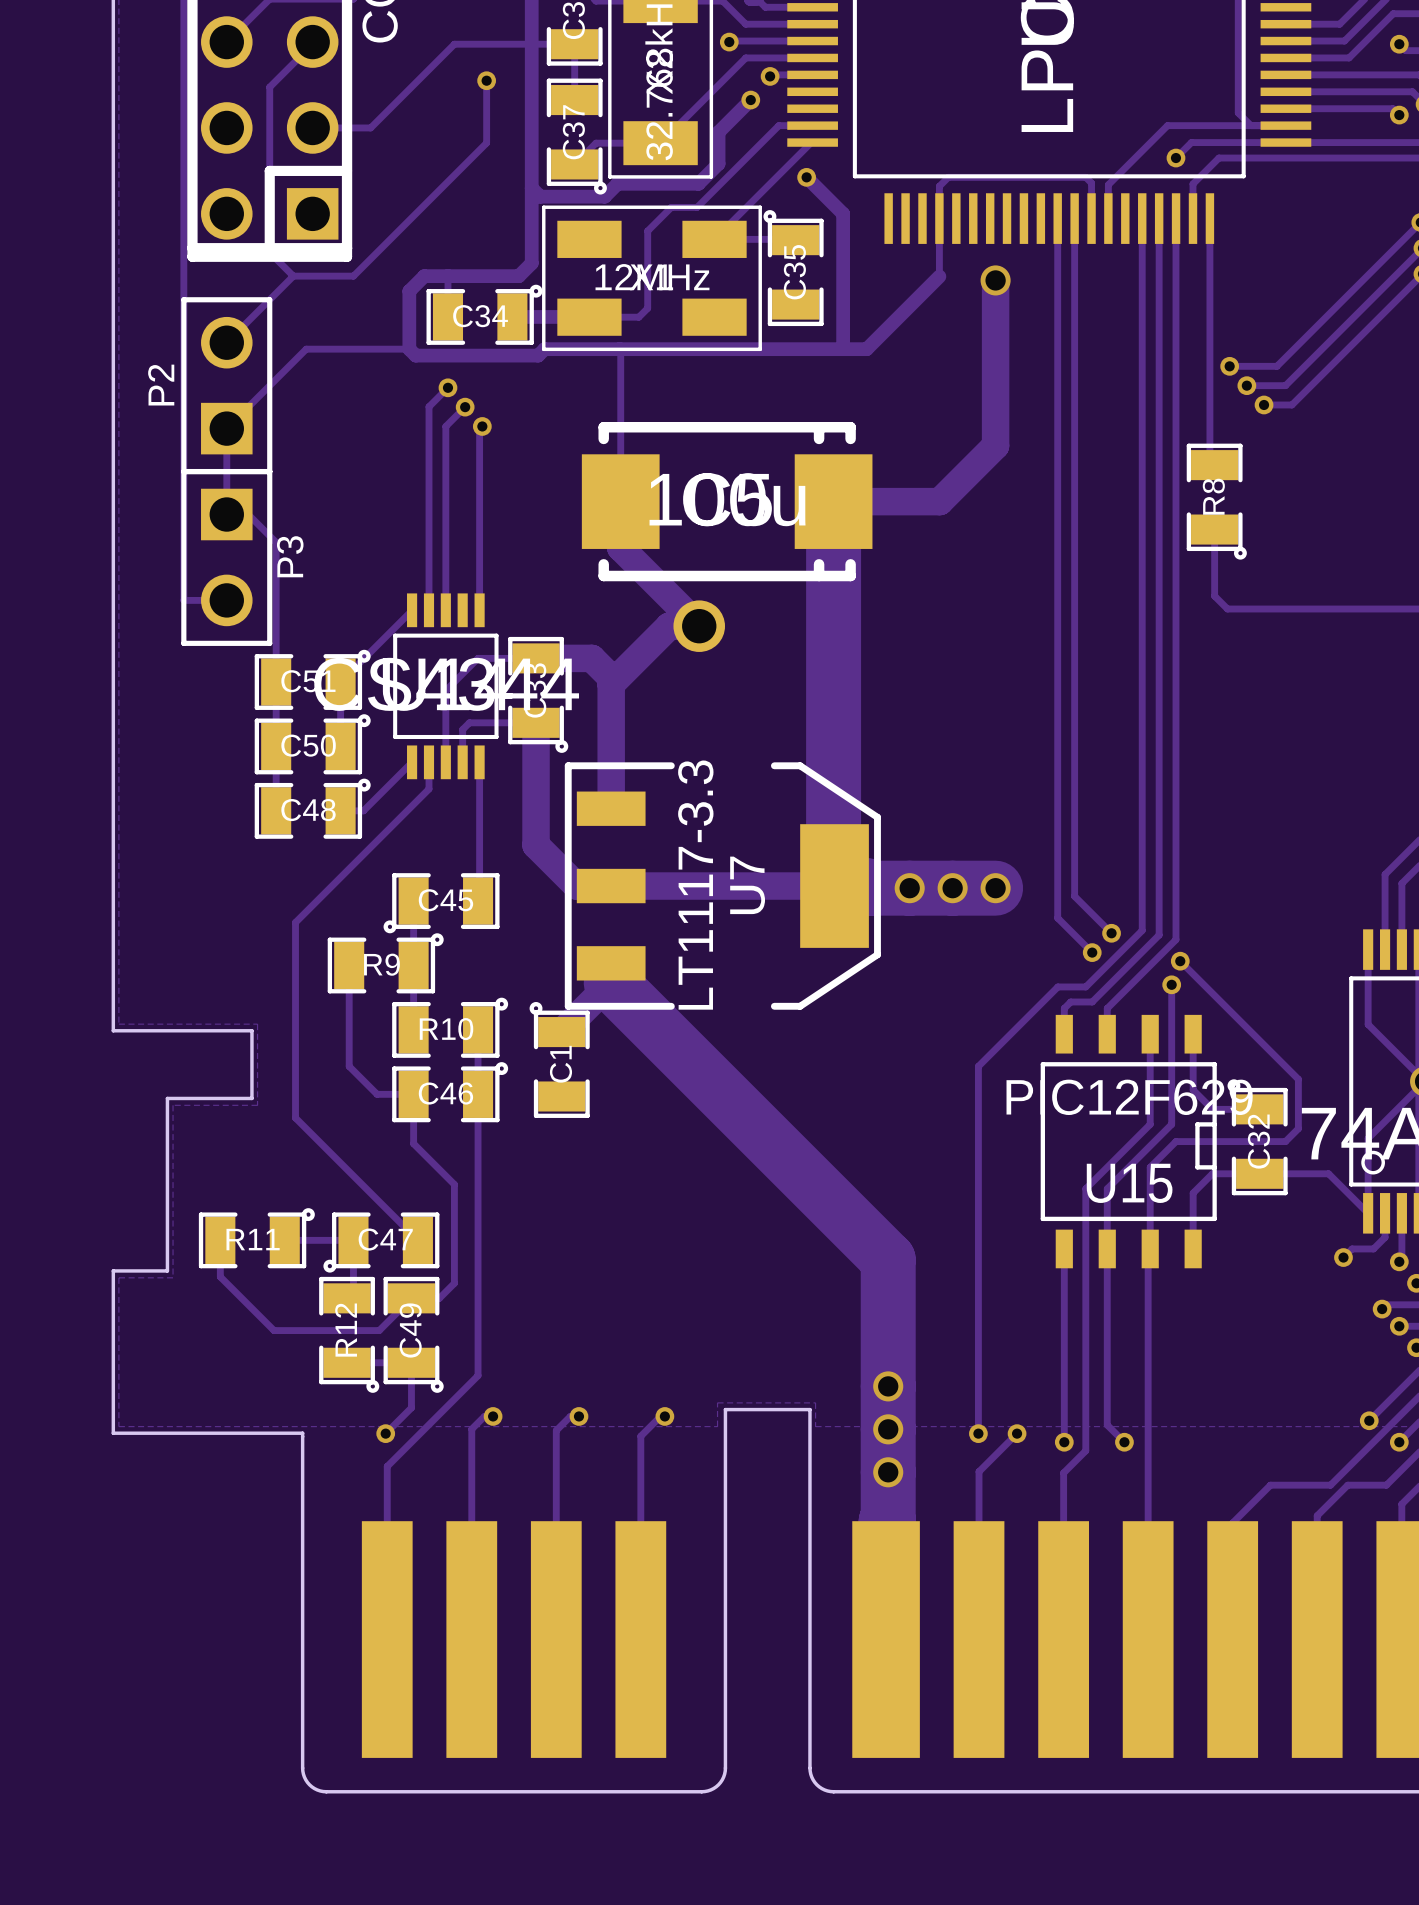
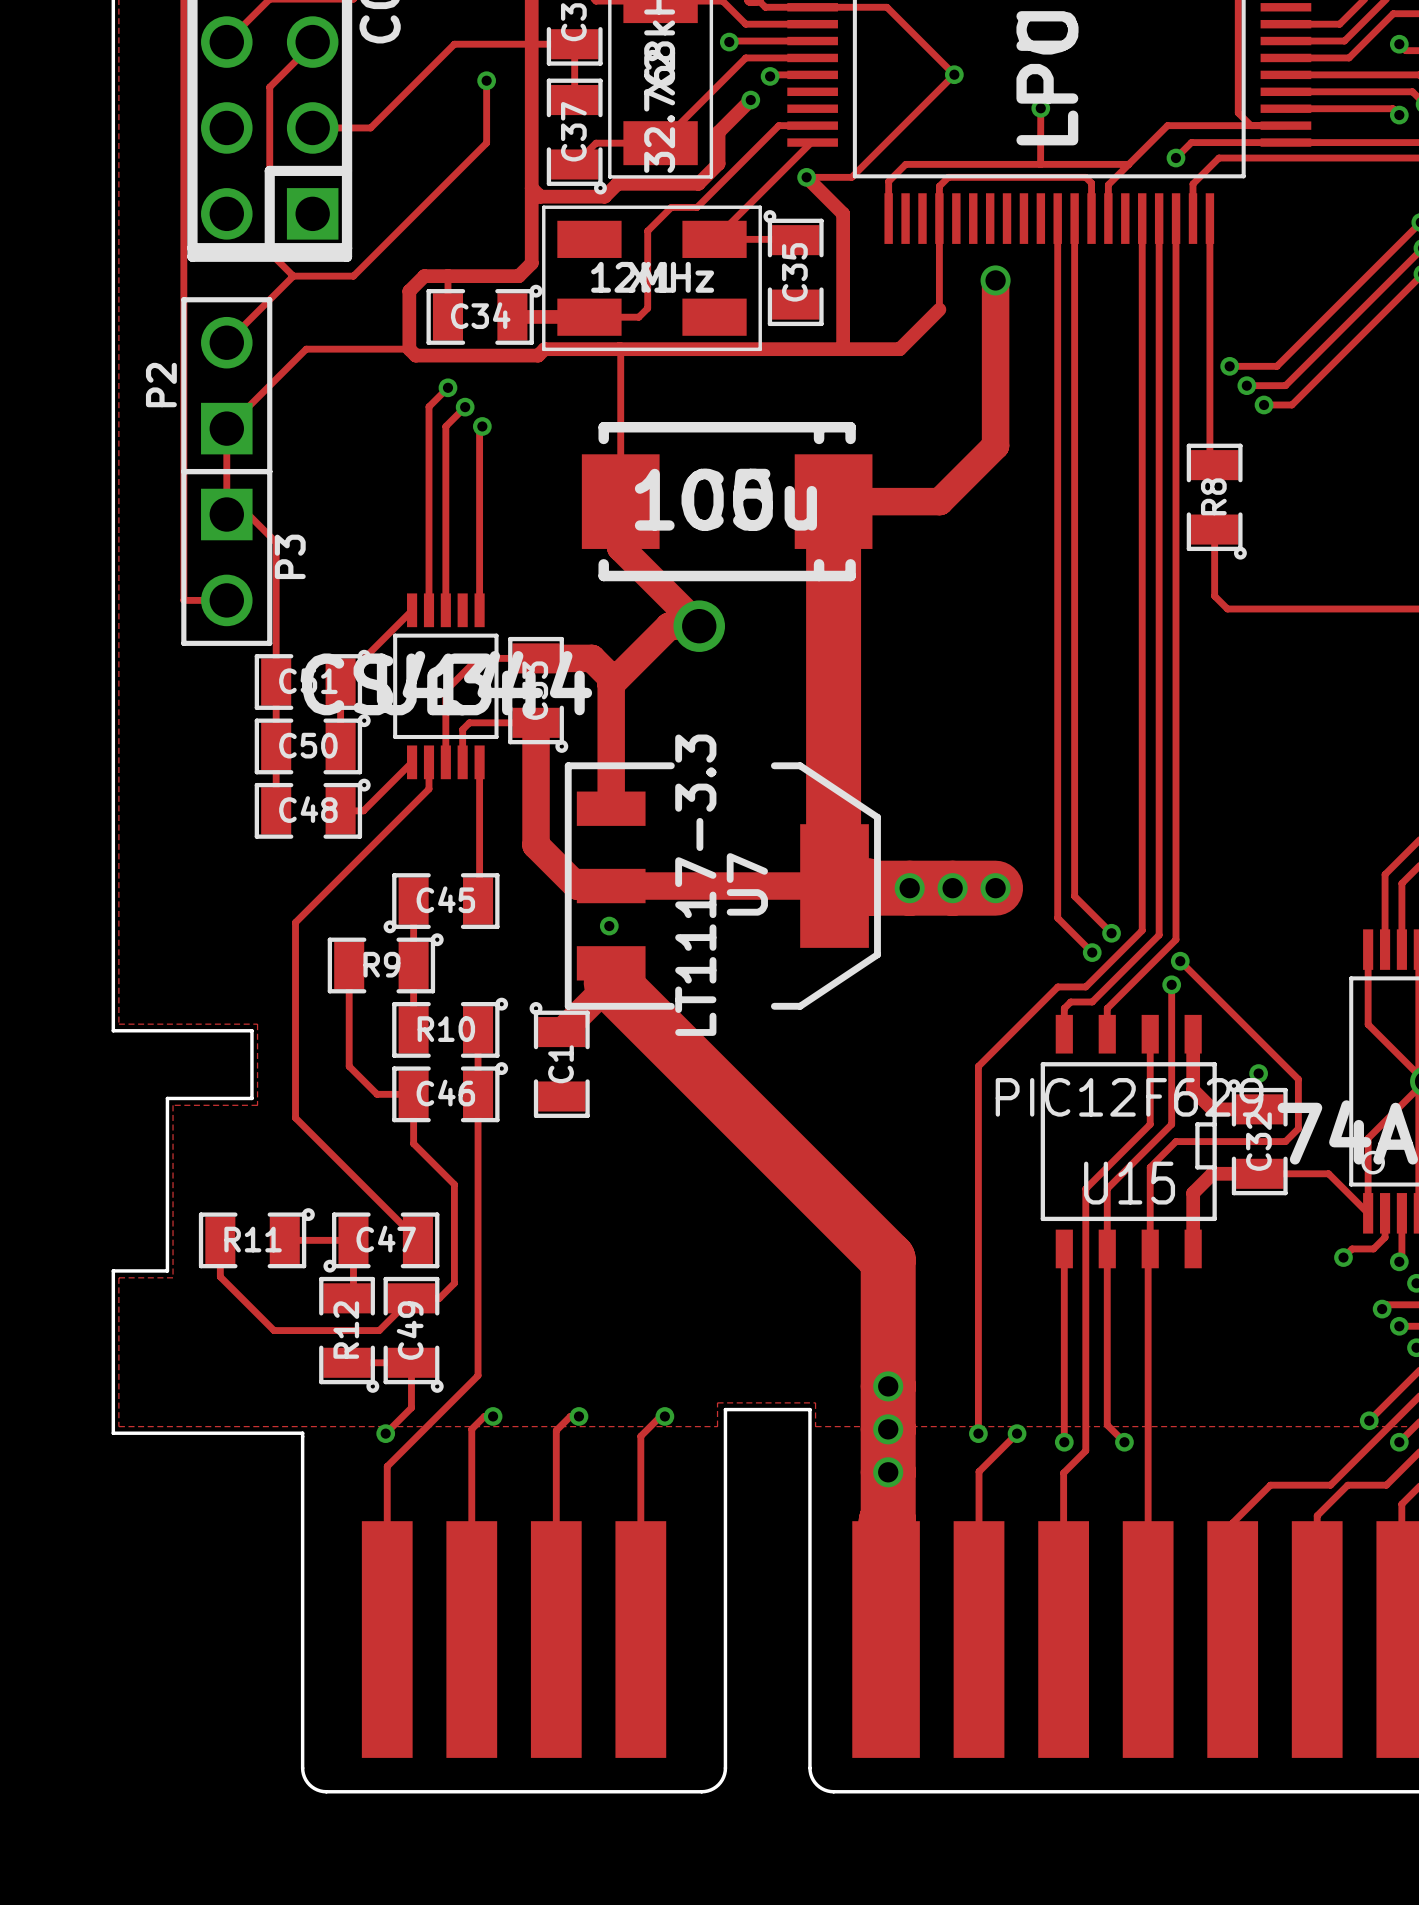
track: none -> (812, 7) (886, 7) (954, 74) (851, 177) (806, 177)
via: none -> (954, 74)
track: none -> (1040, 108) (1040, 164)
via: none -> (1040, 108)
track: none -> (1128, 164) (905, 164) (888, 181) (888, 218)
track: (939, 276) (866, 349) -> (939, 276) (939, 309) (899, 349) (866, 349)
via: none -> (609, 926)
track width: thin (1193, 1034) (1193, 1090) (1212, 1109) (1259, 1109) -> thick (1193, 1034) (1193, 1090) (1212, 1109) (1259, 1109)
via: none -> (1258, 1073)
track width: thin (1259, 1173) (1212, 1173) (1193, 1193) (1193, 1248) -> thick (1259, 1173) (1212, 1173) (1193, 1193) (1193, 1248)

